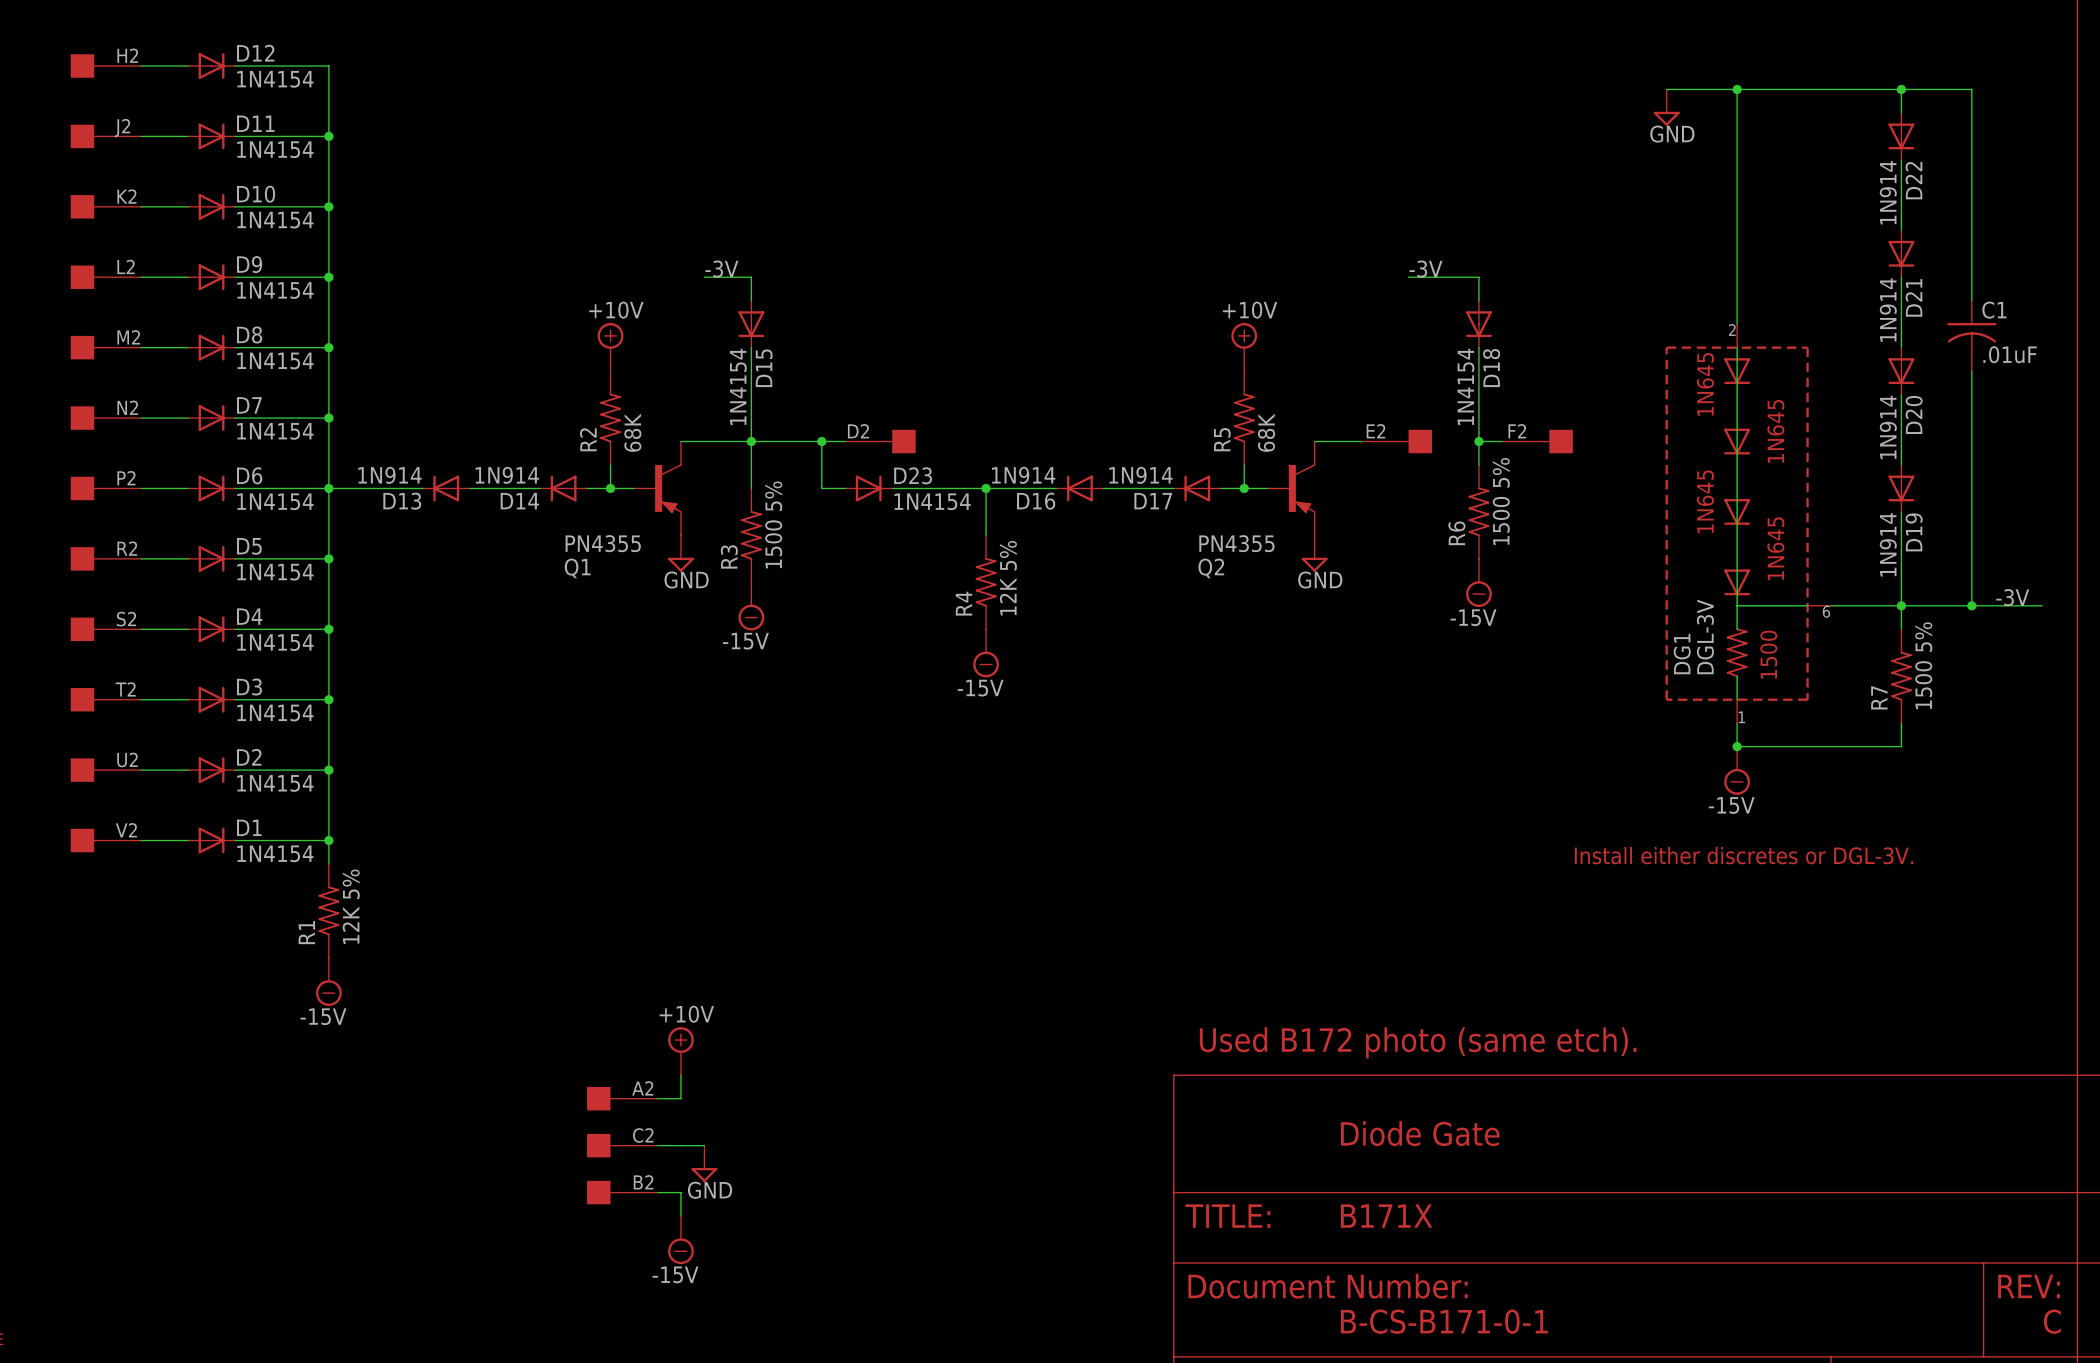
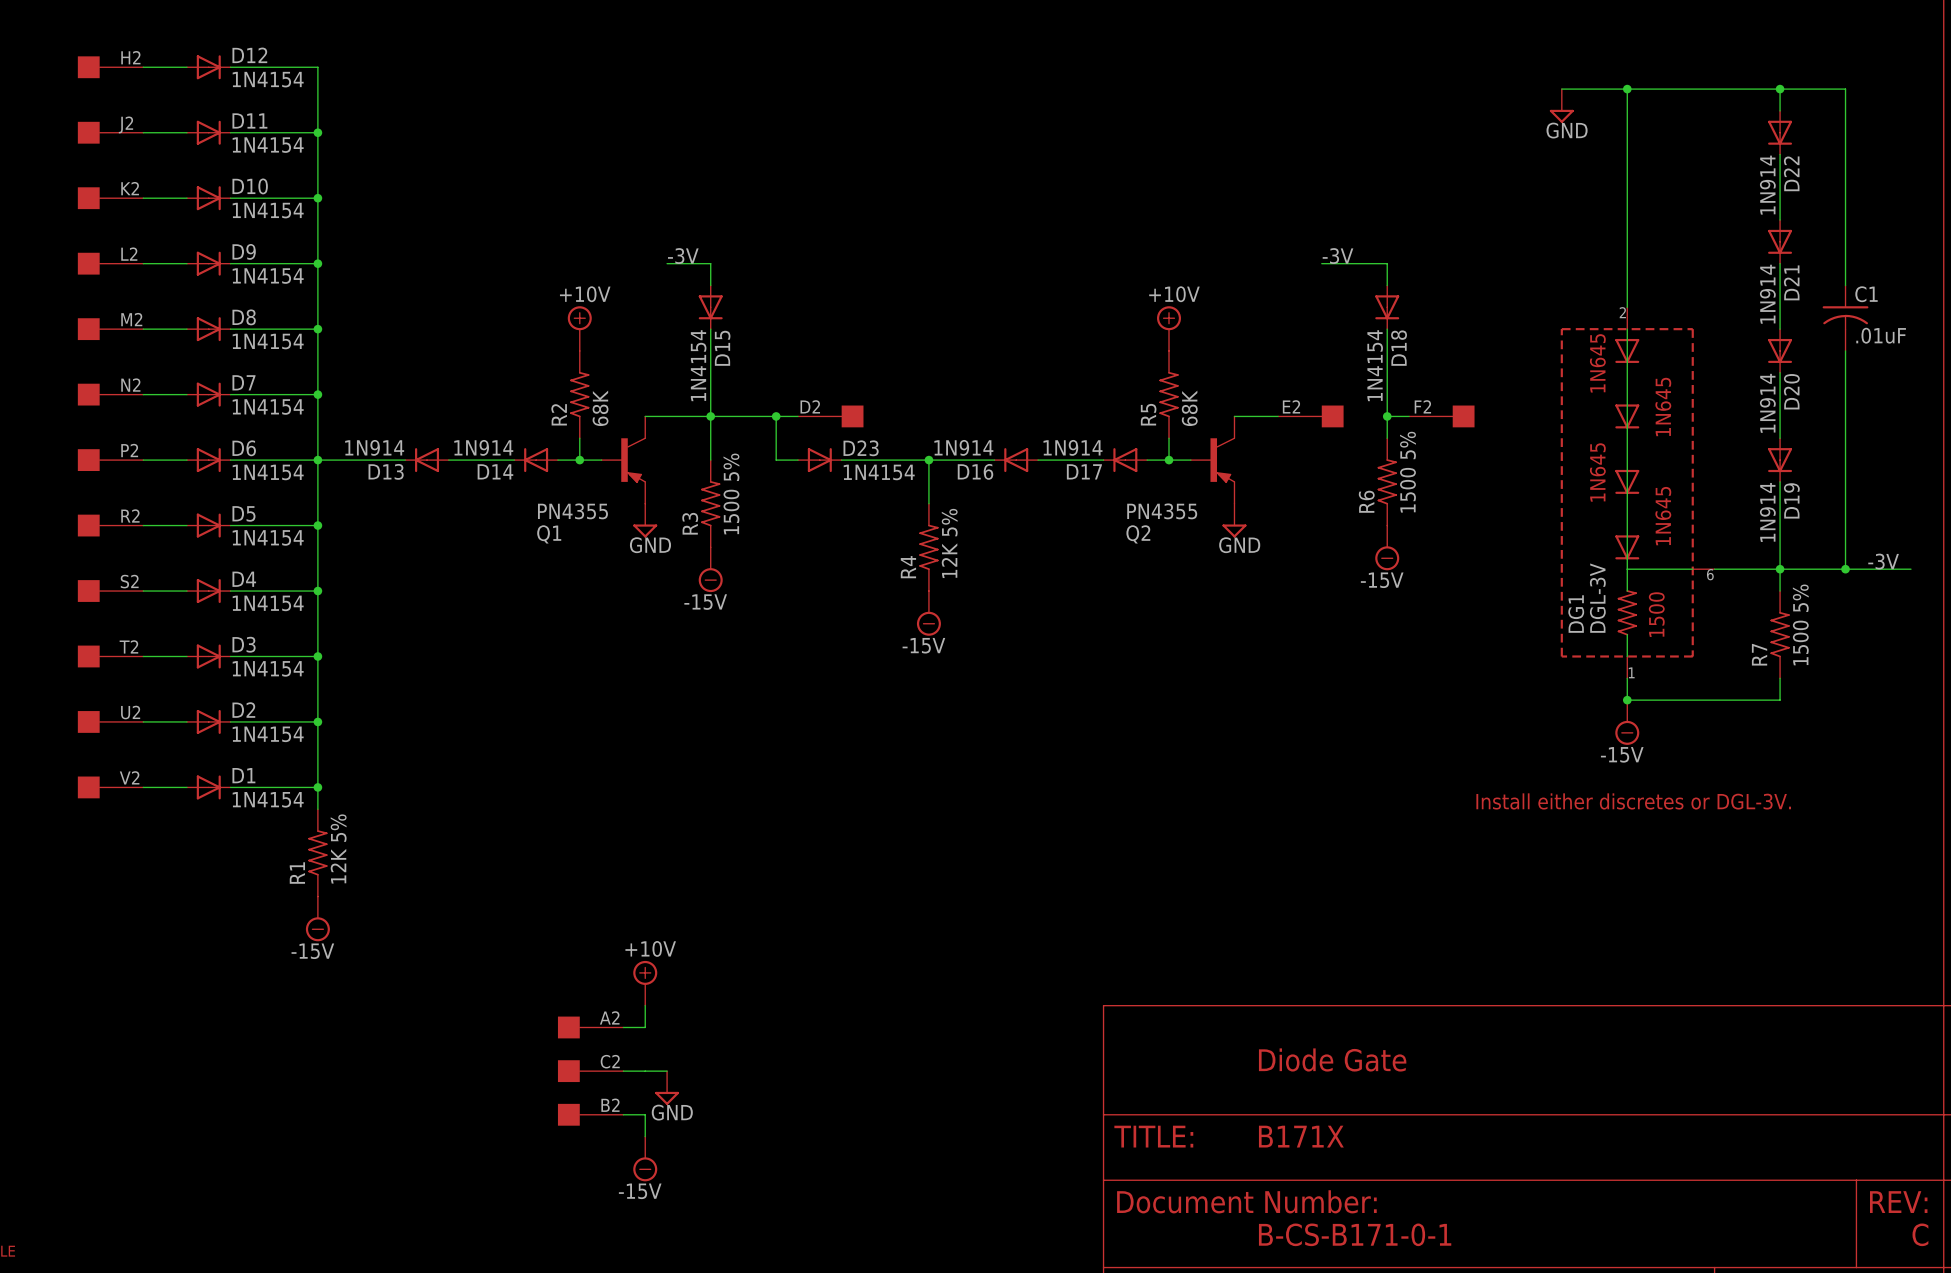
text: Used B172 photo (same etch). (1418, 1042) -> none

